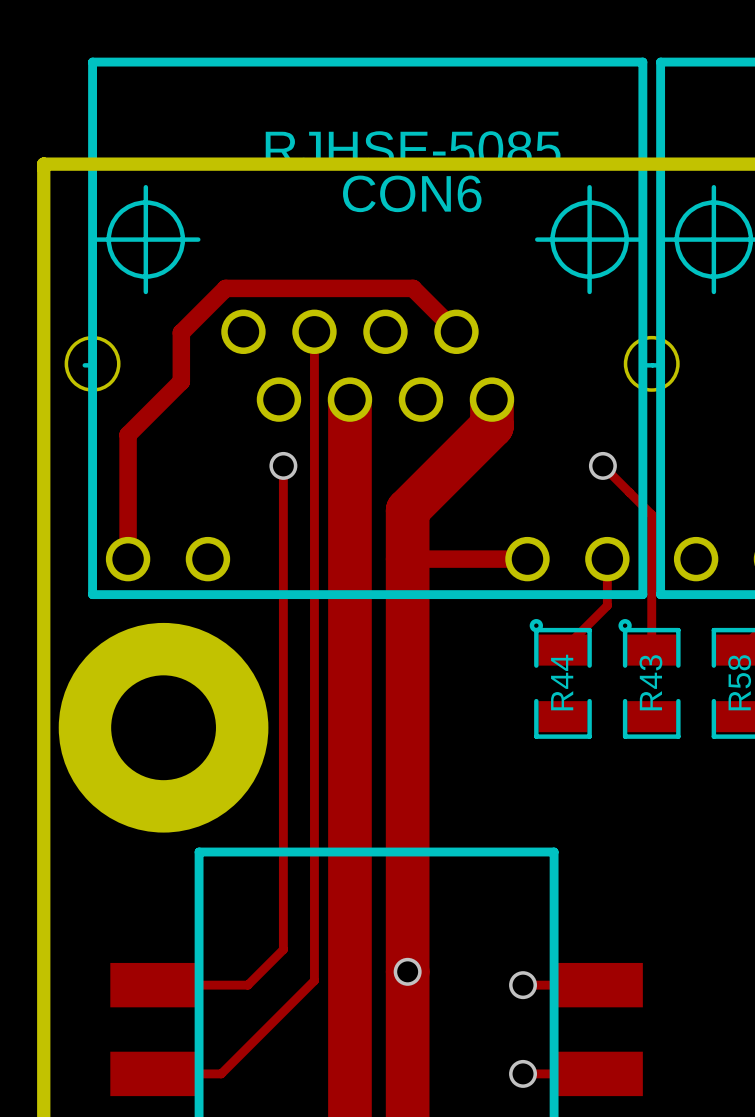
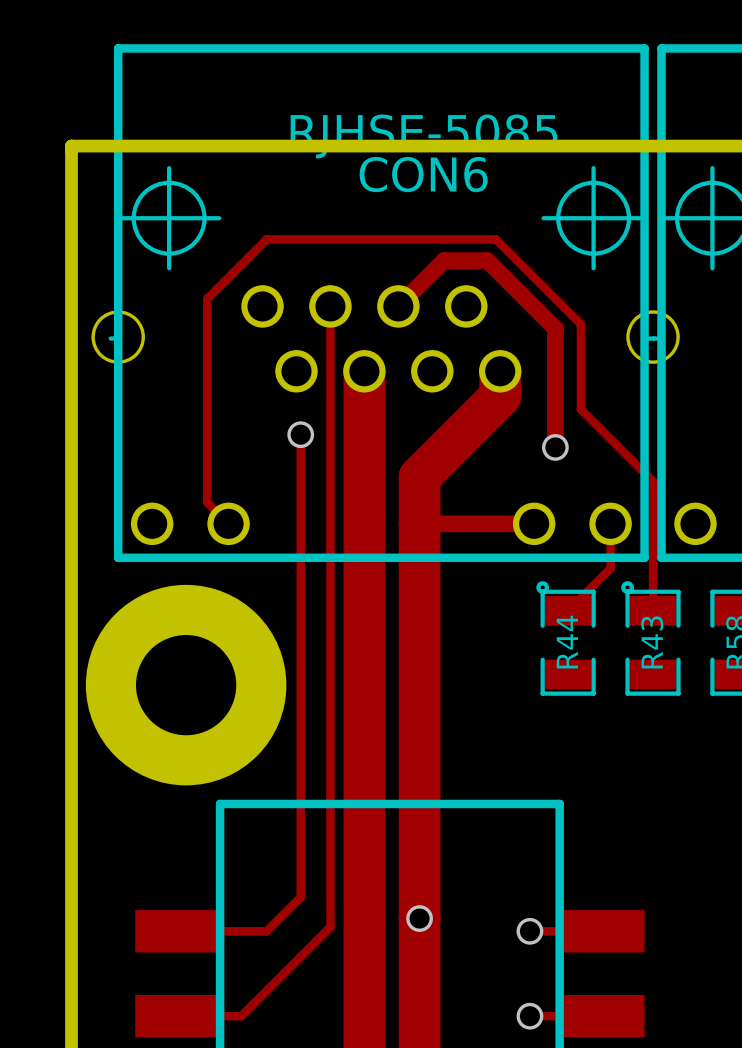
track: none -> (398, 306) (444, 260) (487, 260) (555, 328) (555, 447)
track: (456, 331) (413, 288) (225, 288) (181, 332) (181, 381) (128, 434) (128, 559) -> none
track: none -> (606, 434) (580, 409) (580, 324) (495, 239) (266, 239) (207, 298) (207, 502) (228, 523)
via position: (602, 465) -> (555, 447)

